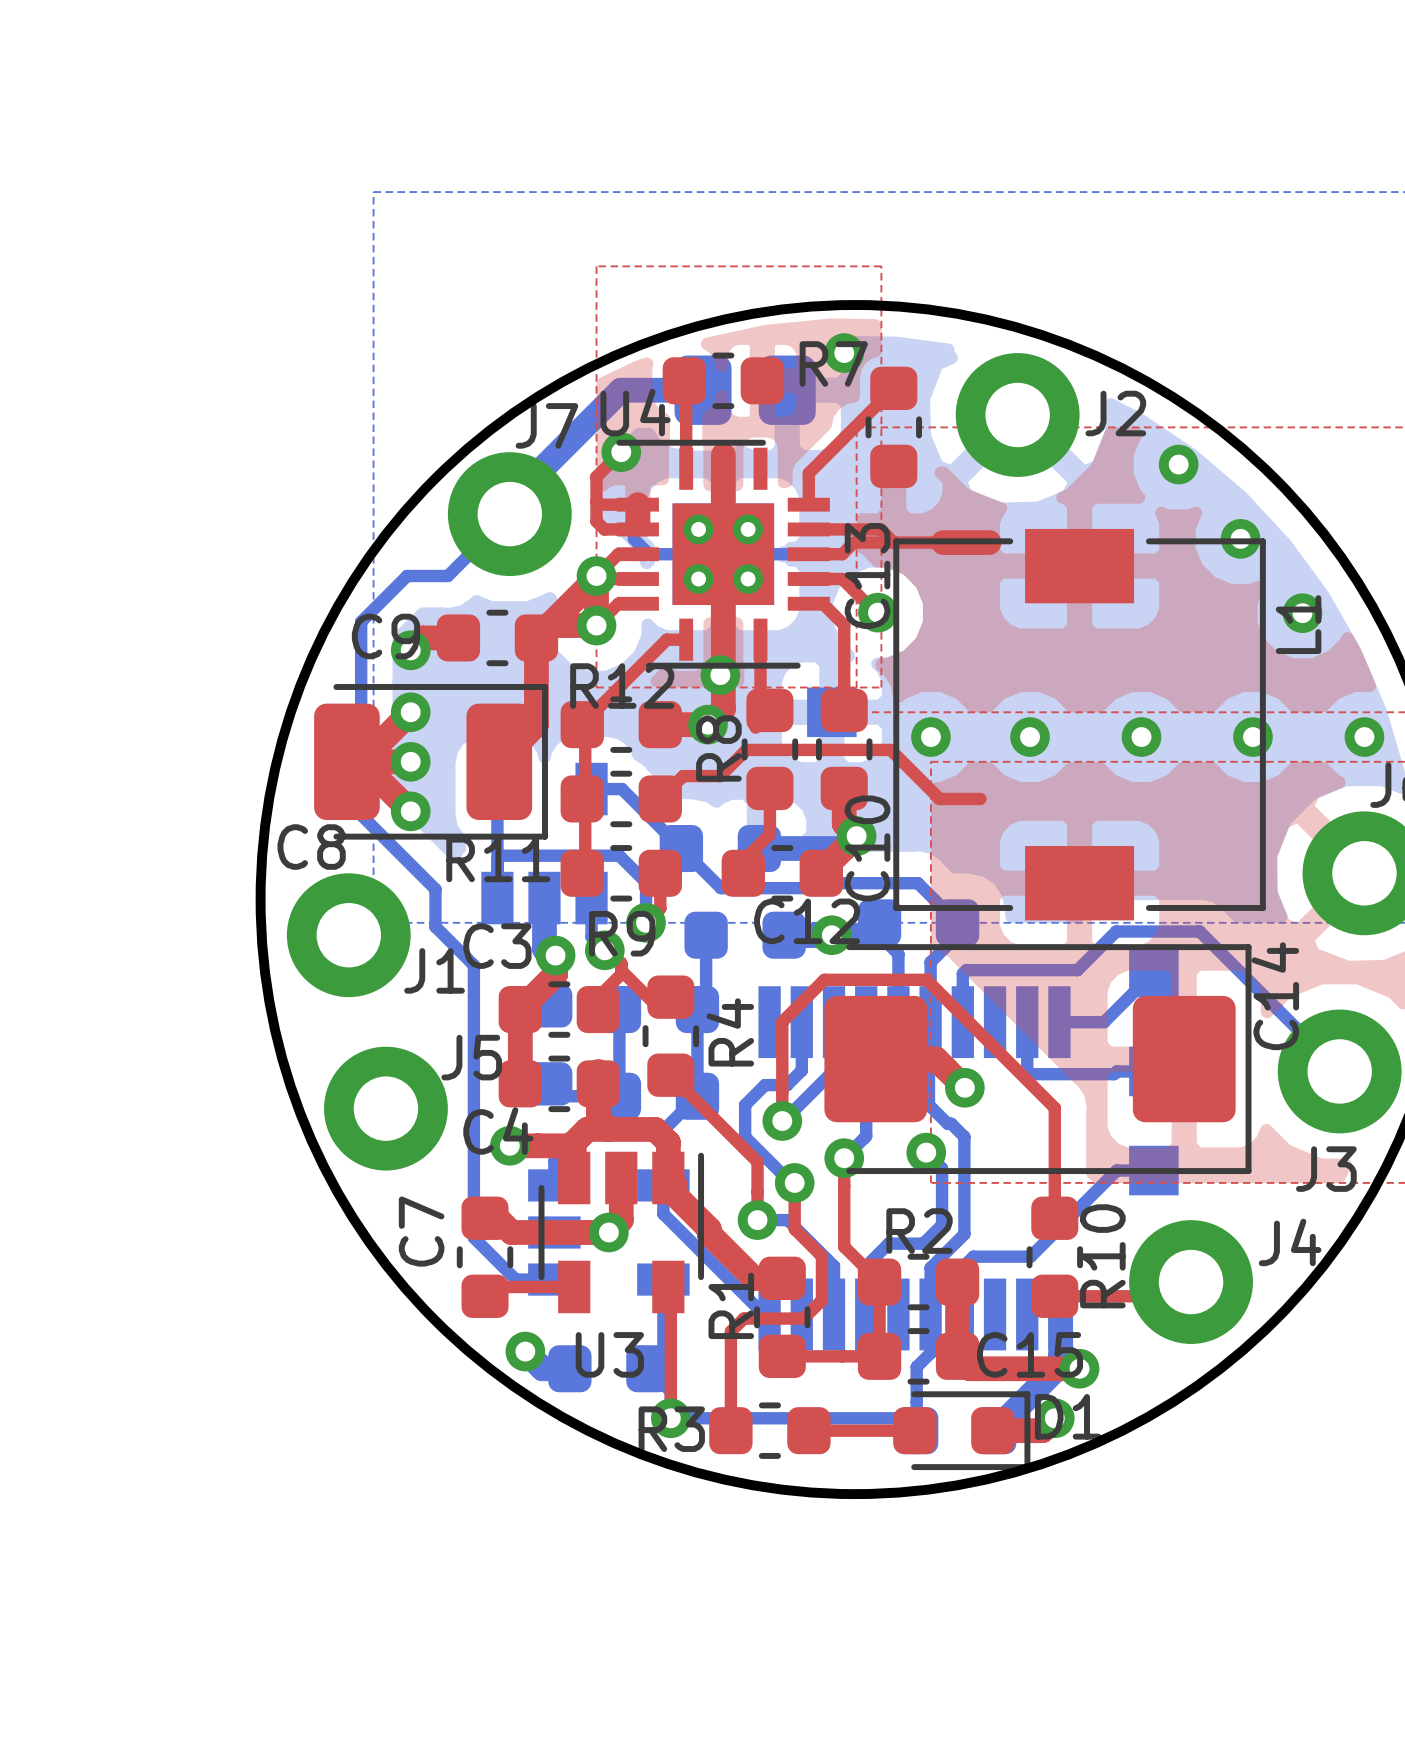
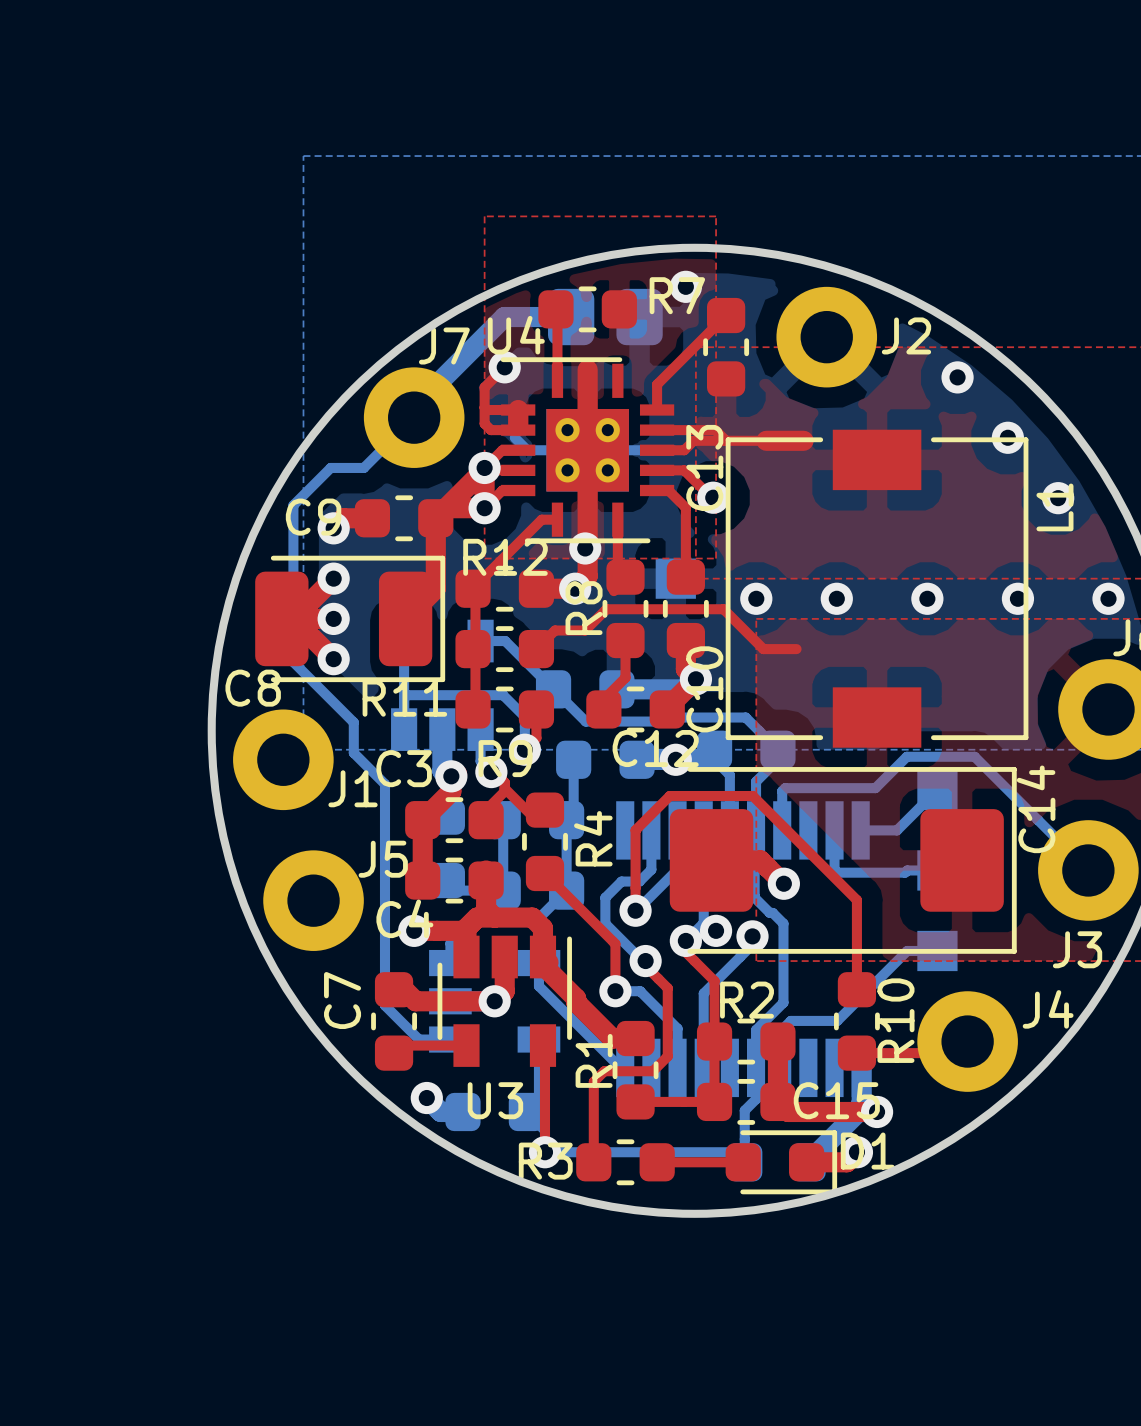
via: none -> (716, 930)
bottom track: (926, 1152) (942, 1168) (942, 1224) (923, 1243) (888, 1243) (866, 1266) -> (756, 940) (703, 993) (703, 1028)
top track: (844, 1158) (844, 1246) (879, 1282) -> (678, 944) (714, 981) (714, 1041)
top track: (794, 1182) (794, 1229) (821, 1256) -> (642, 962) (667, 988) (667, 1020)

